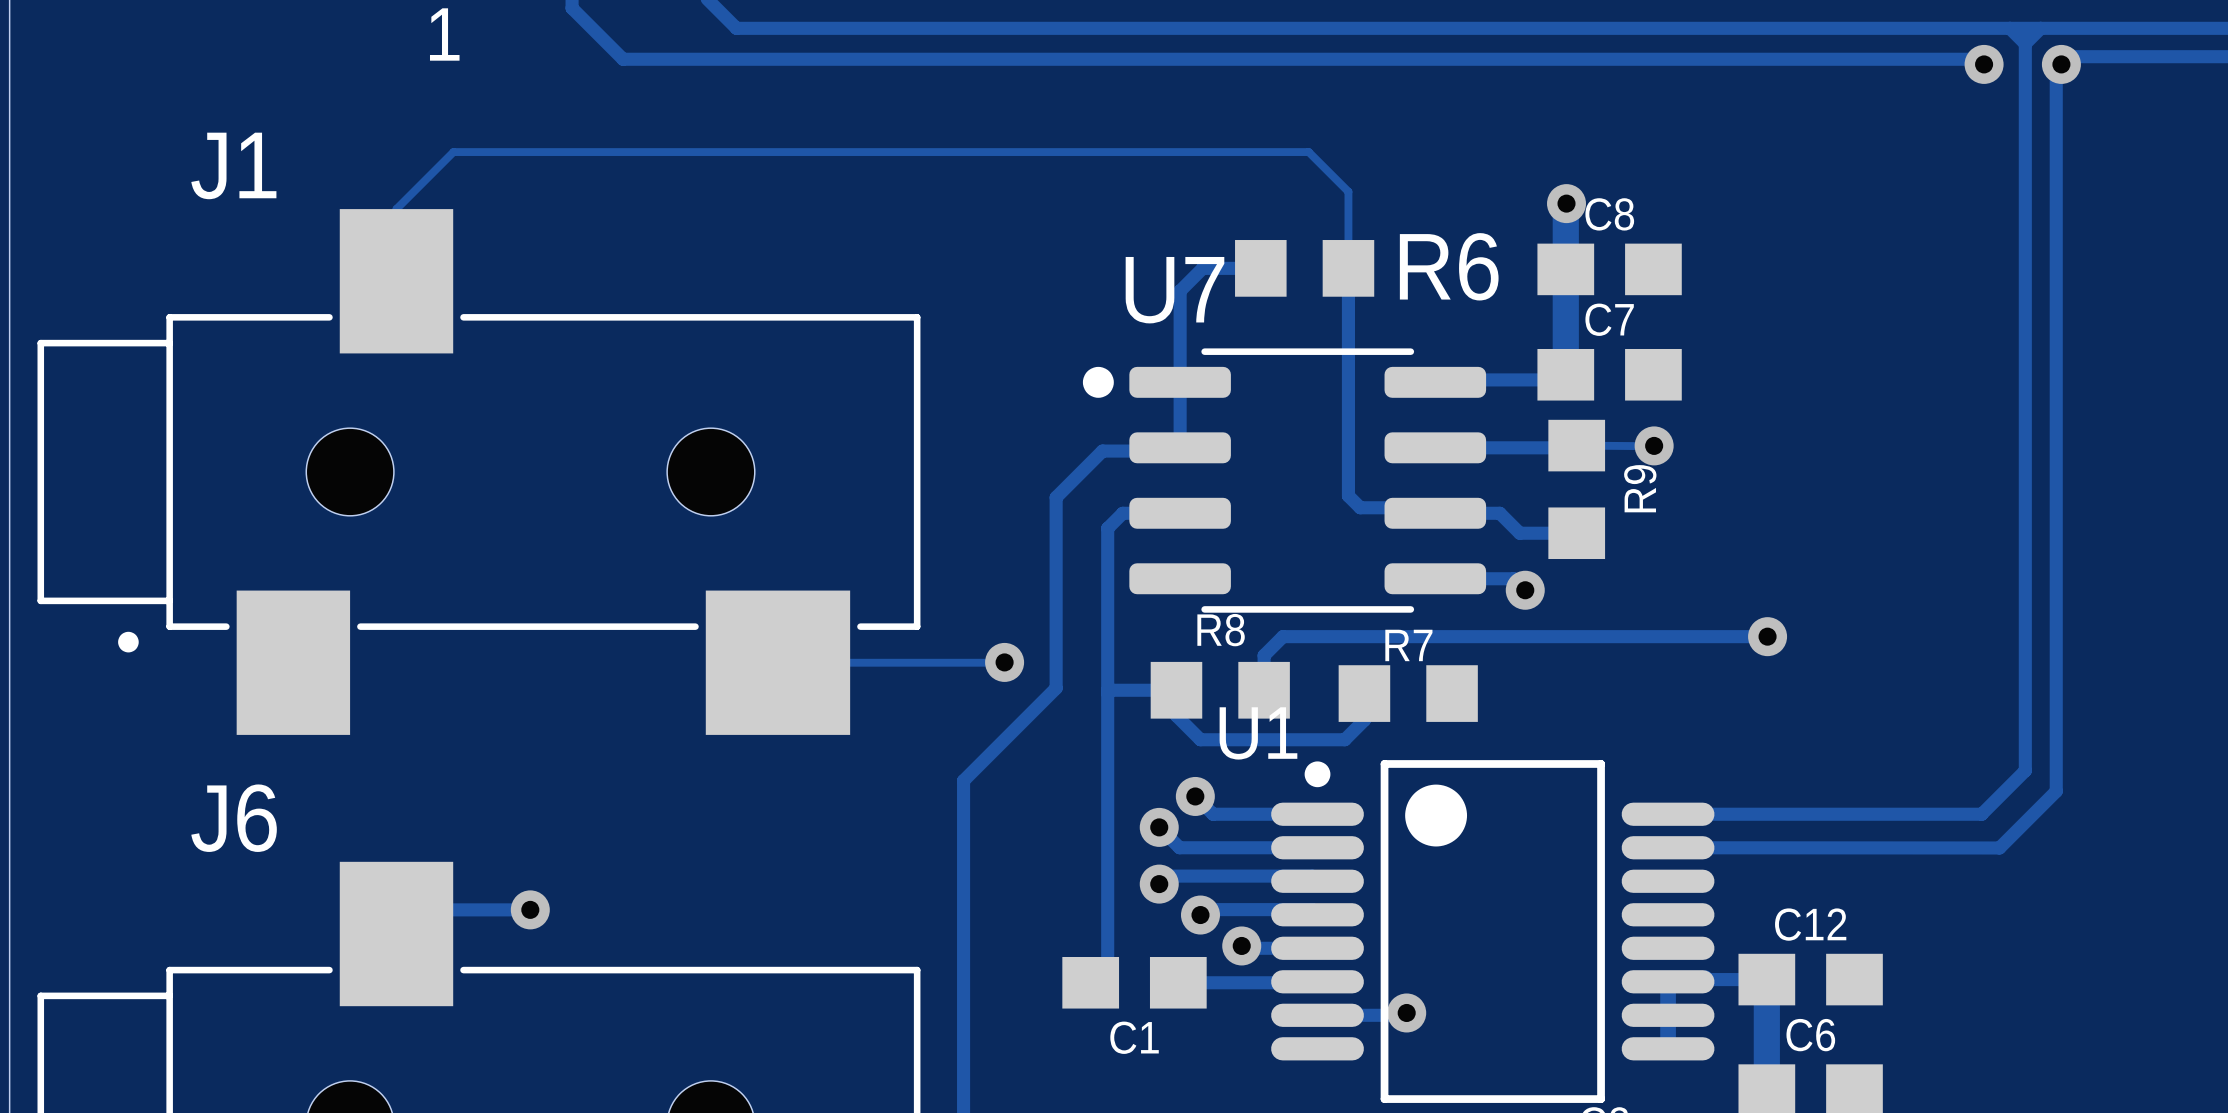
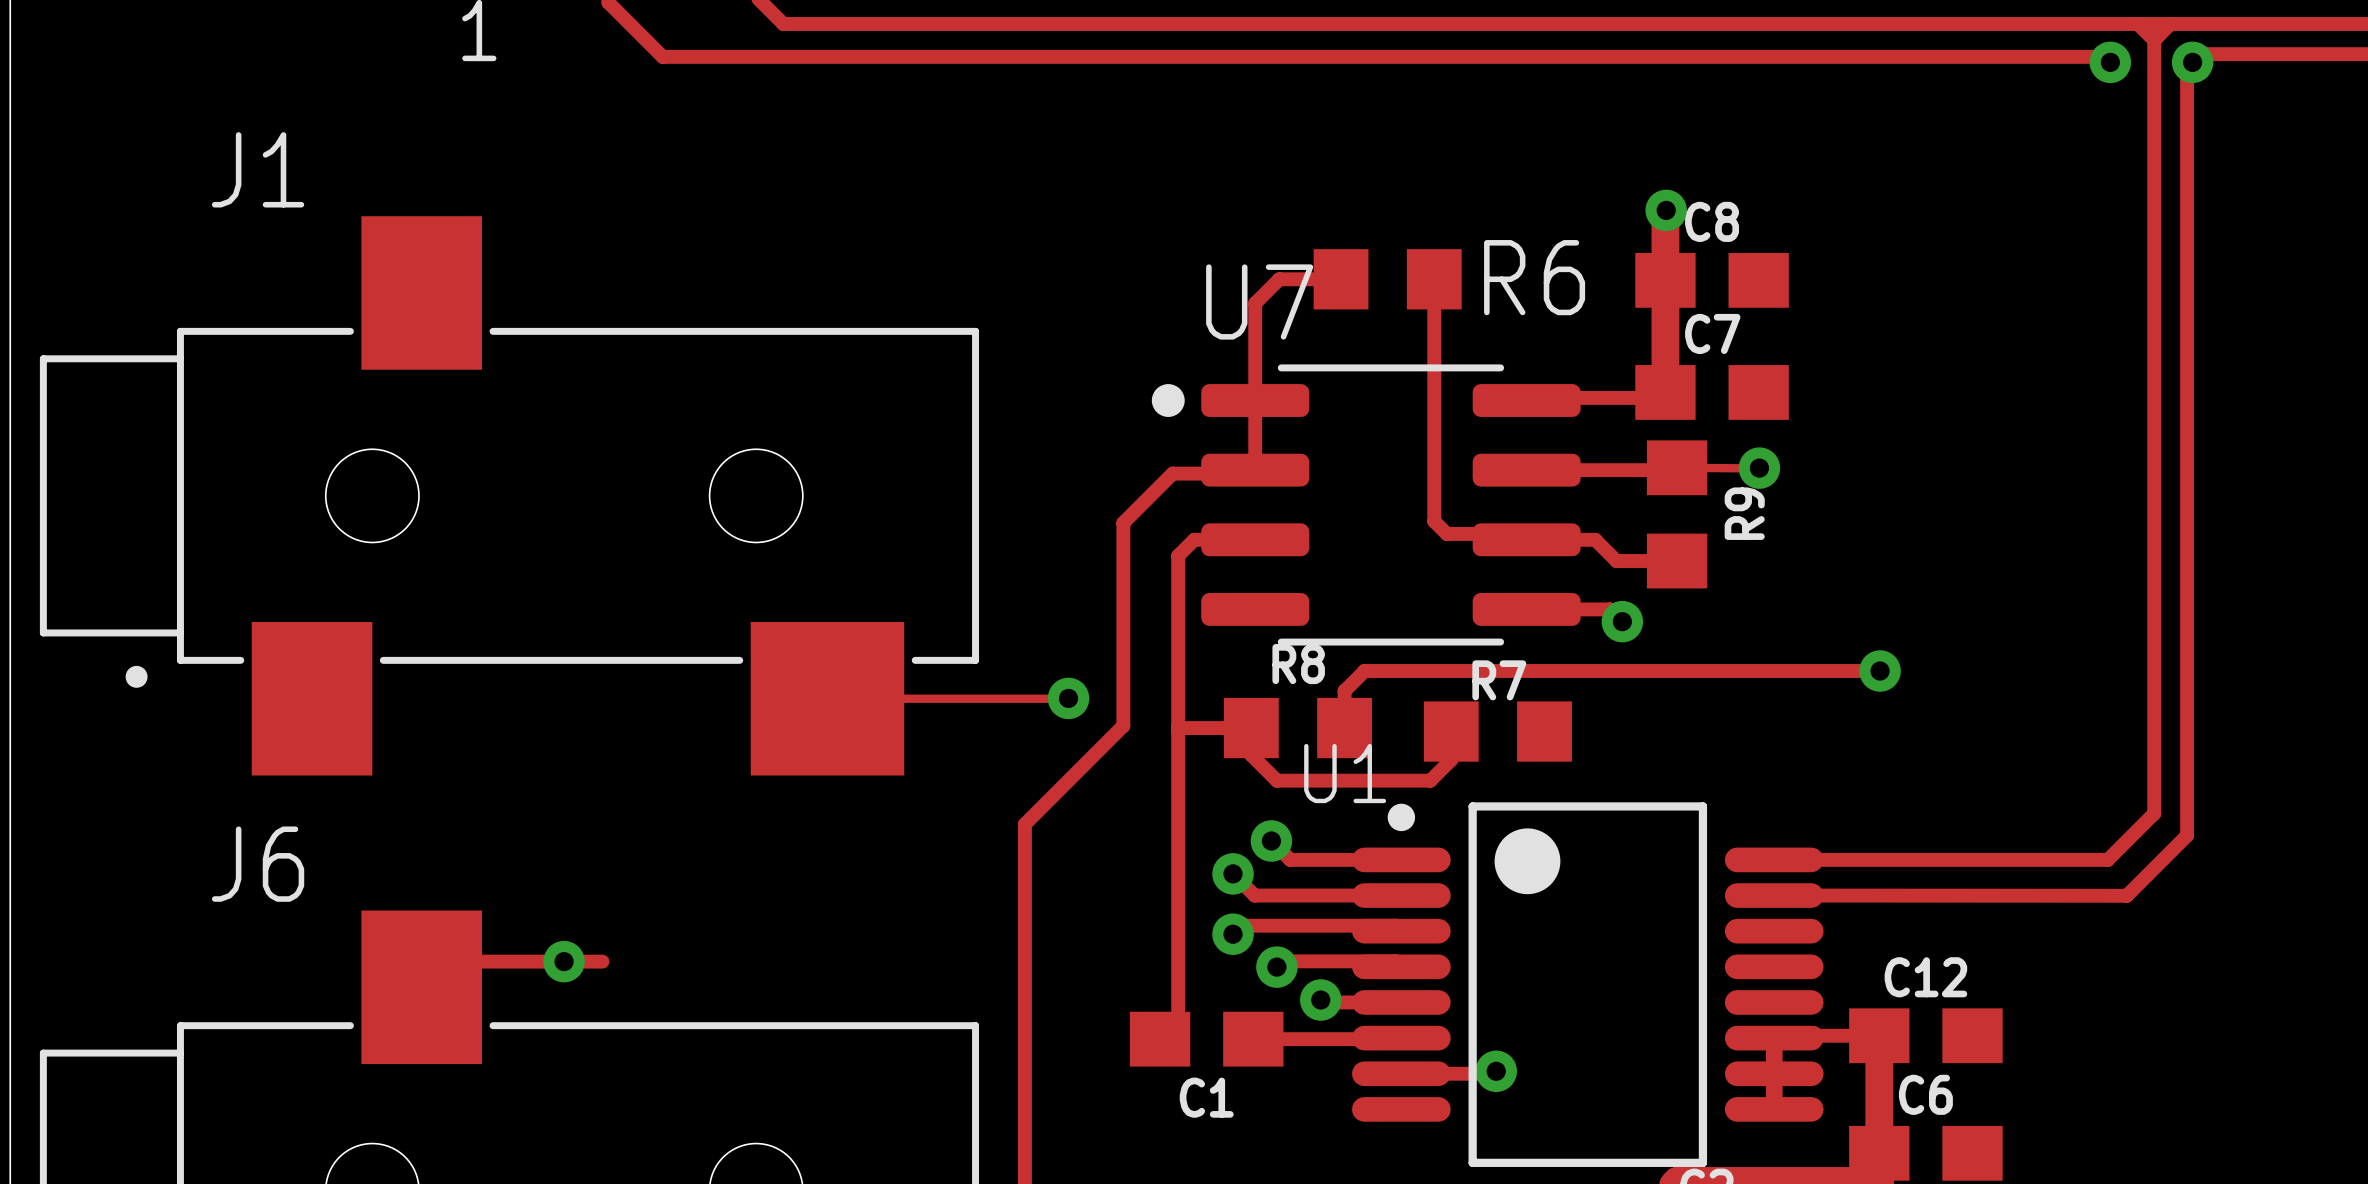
track: (1348, 268) (1348, 191) (1308, 152) (453, 152) (396, 209) (396, 281) -> none
track: none -> (564, 961) (602, 961)

